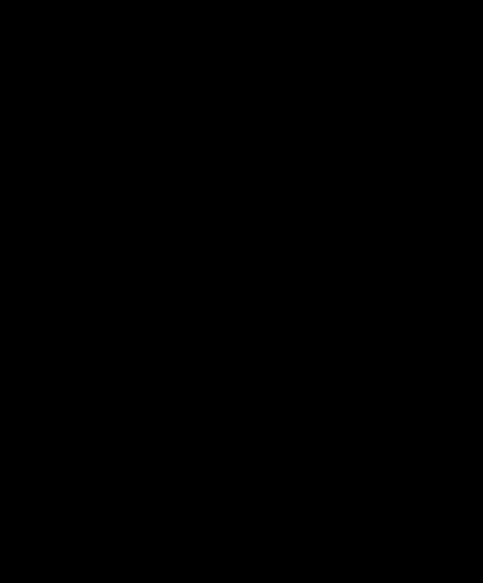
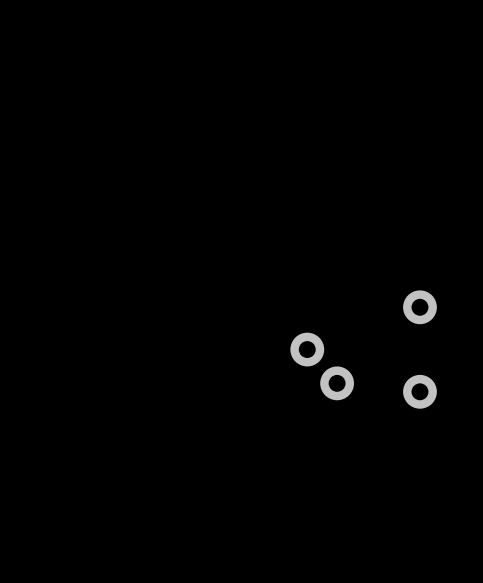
via: none -> (419, 307)
via: none -> (307, 349)
via: none -> (337, 383)
via: none -> (419, 391)

